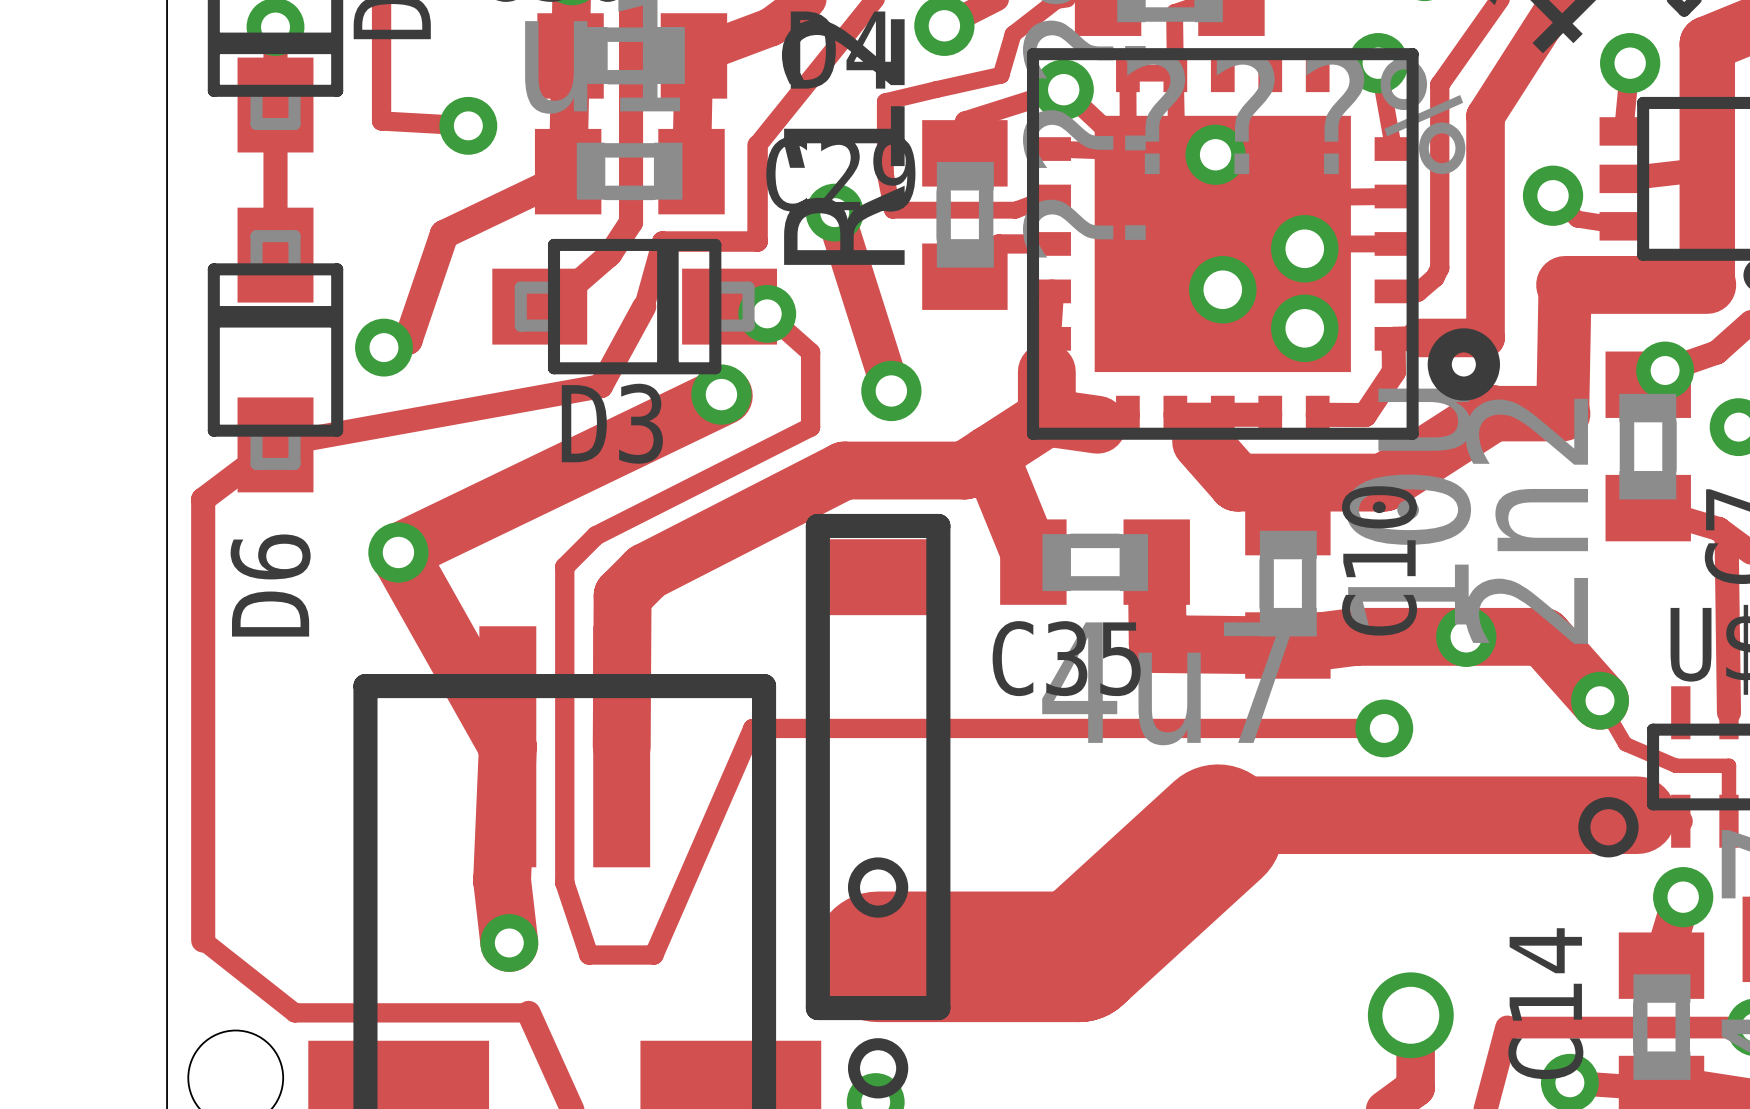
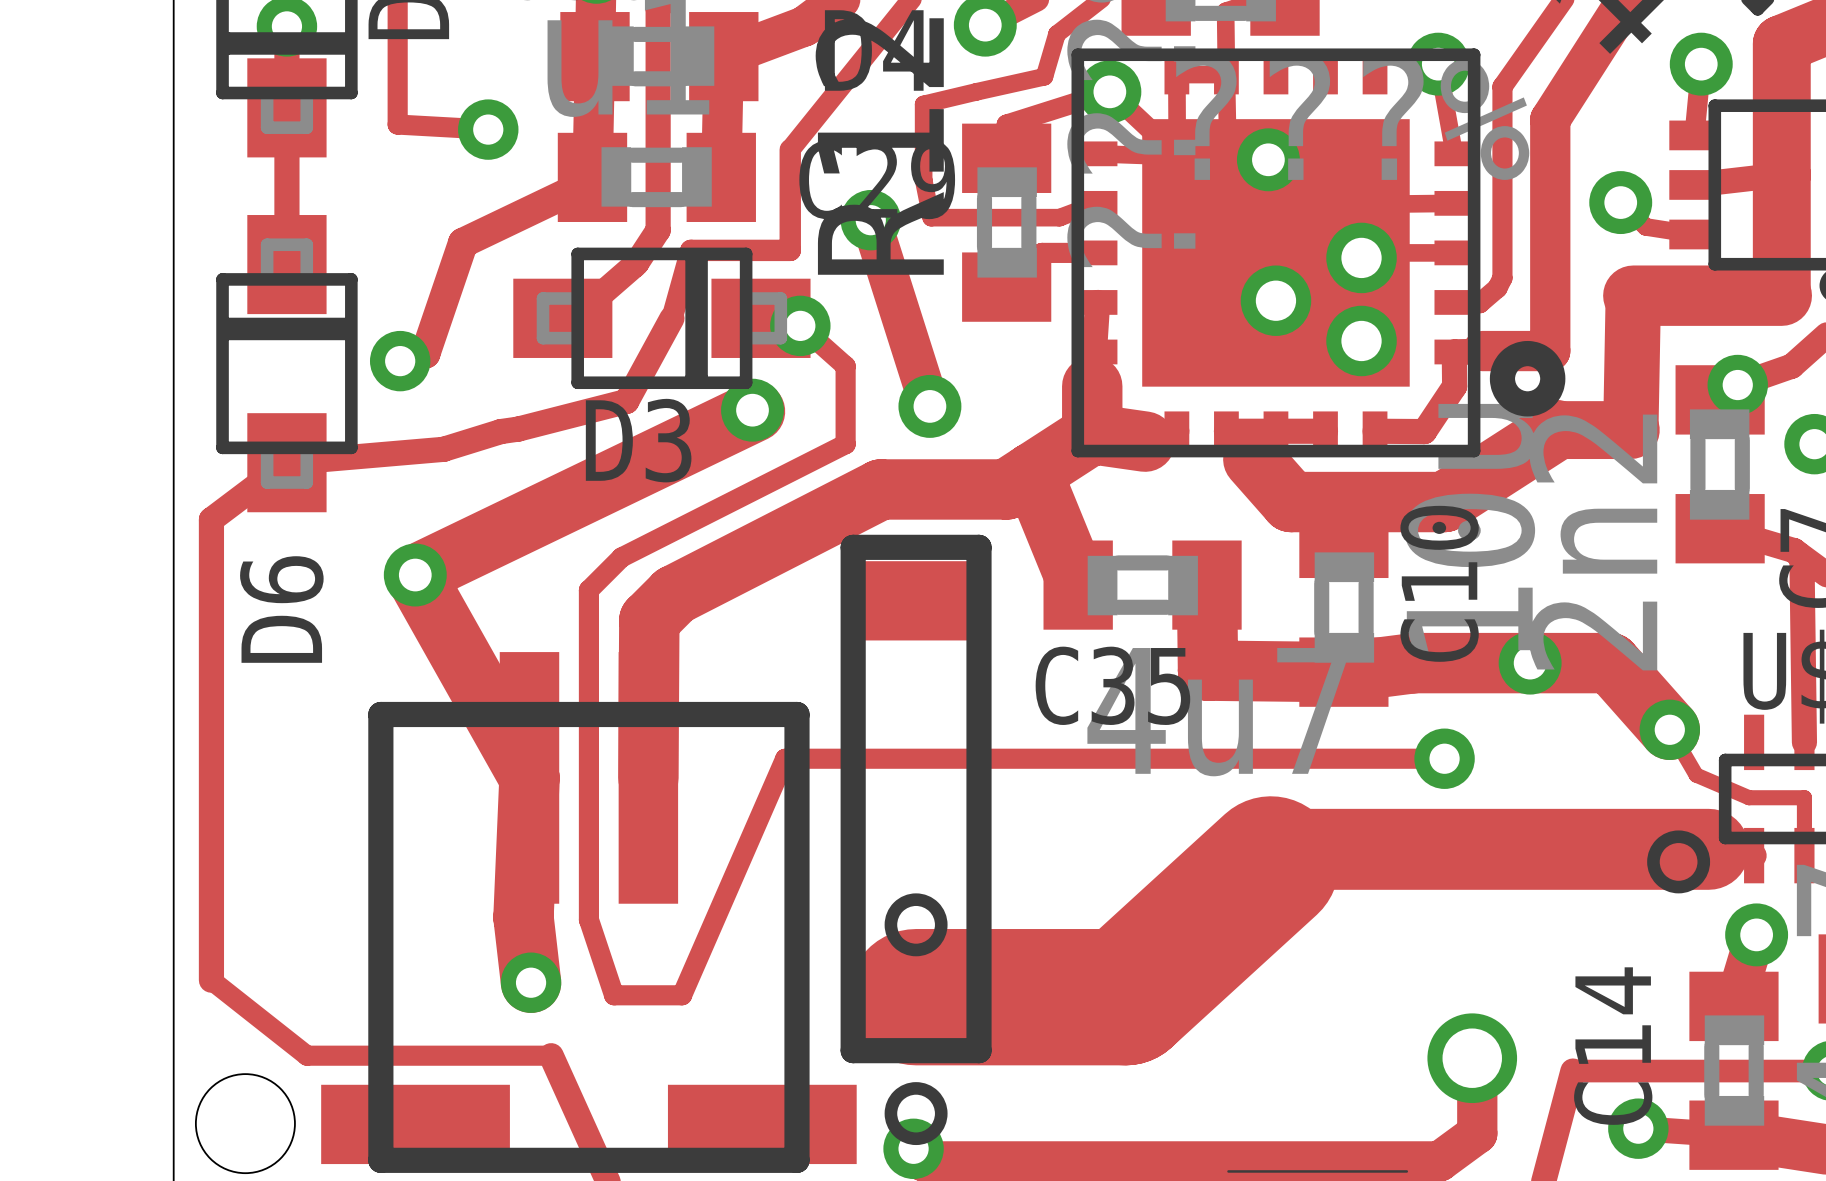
track: (600, 386) (275, 444) -> (626, 401) (518, 429) (500, 431) (443, 449) (286, 462)

